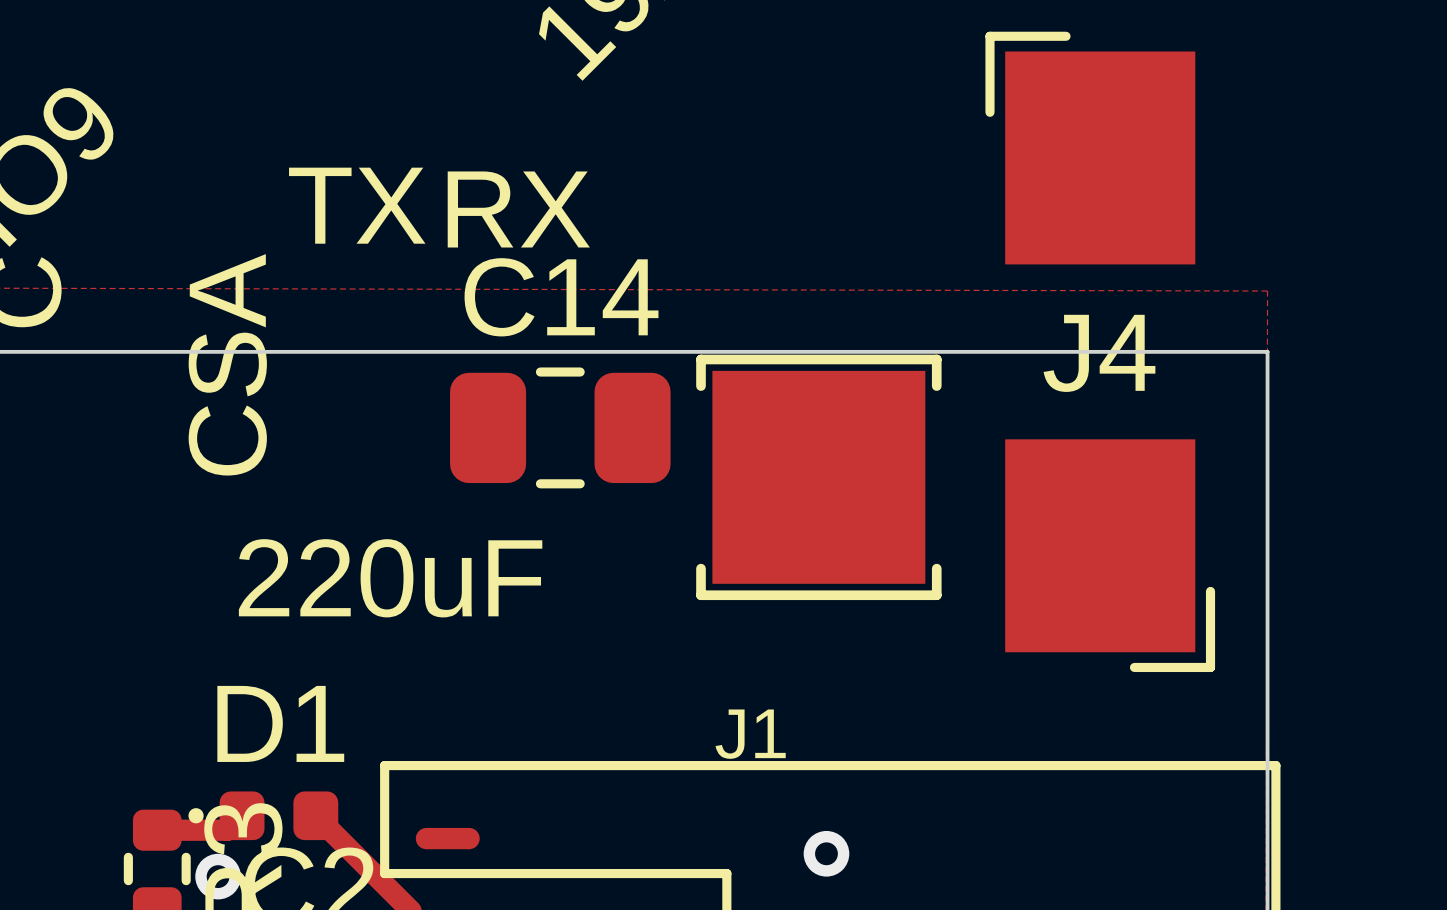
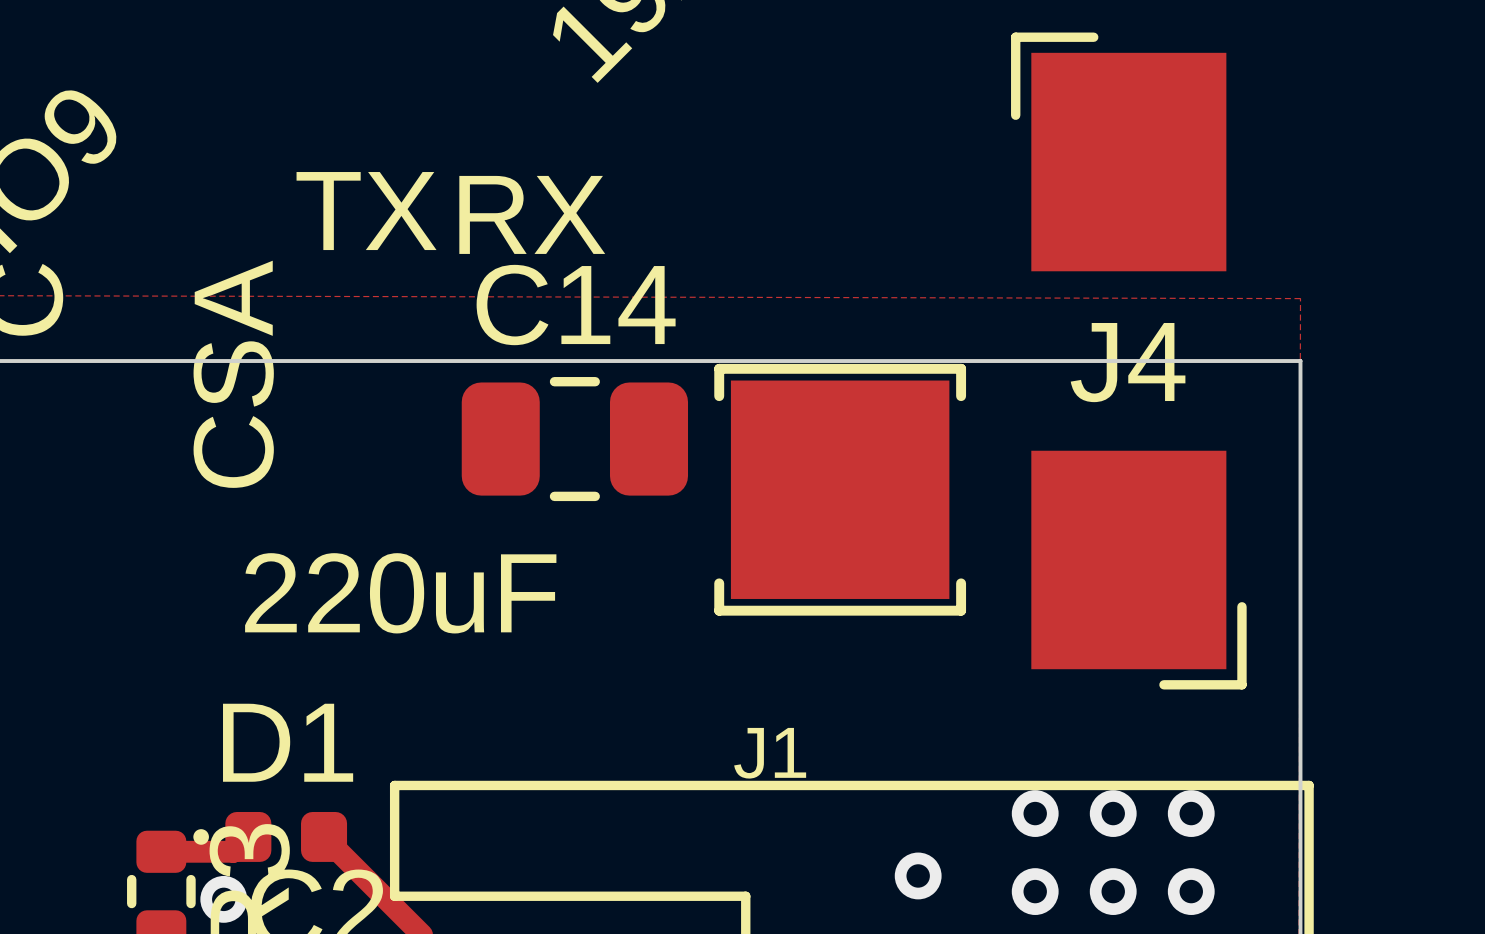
via: none -> (1035, 813)
via: none -> (1113, 813)
via: none -> (1191, 813)
part: (447, 838) -> none
via: (826, 853) -> none
via: none -> (918, 875)
via: none -> (1035, 891)
via: none -> (1113, 891)
via: none -> (1191, 891)

